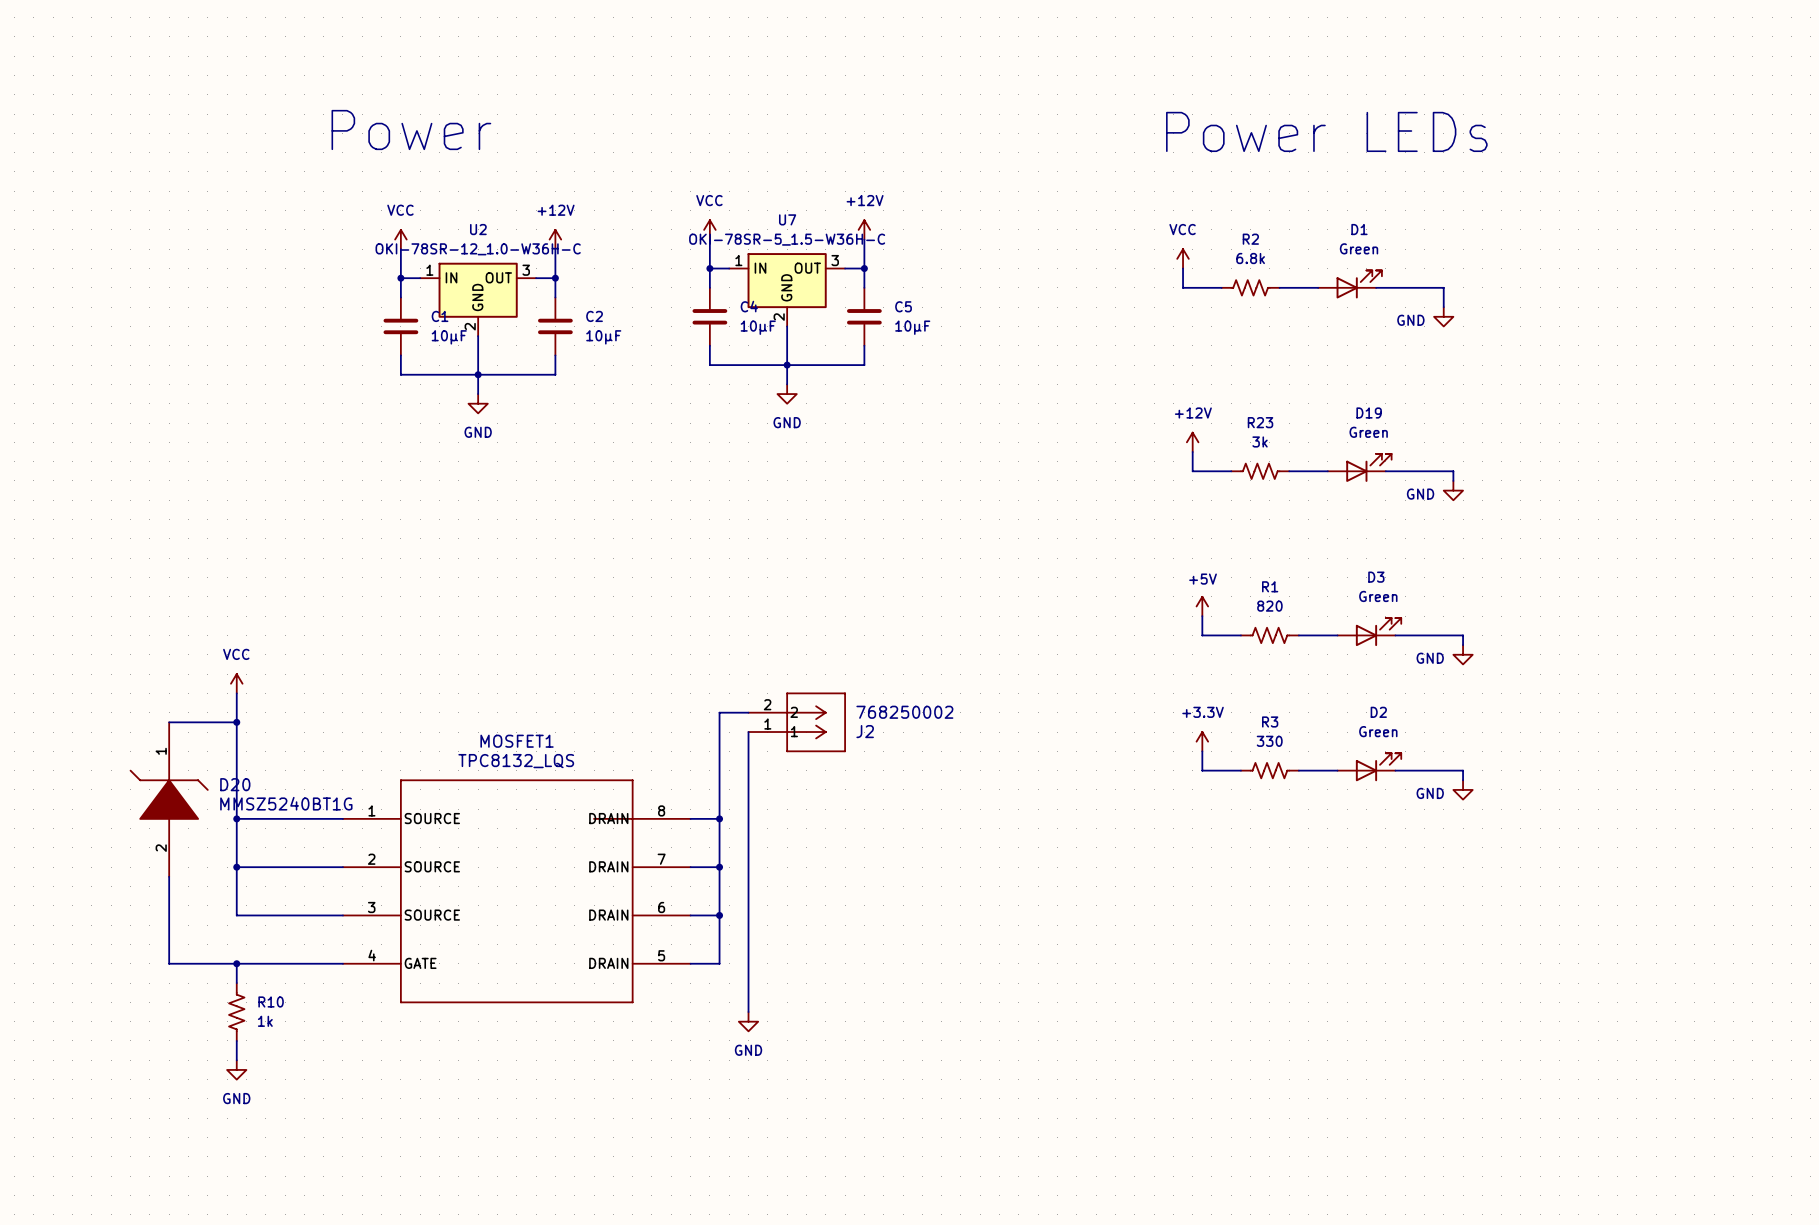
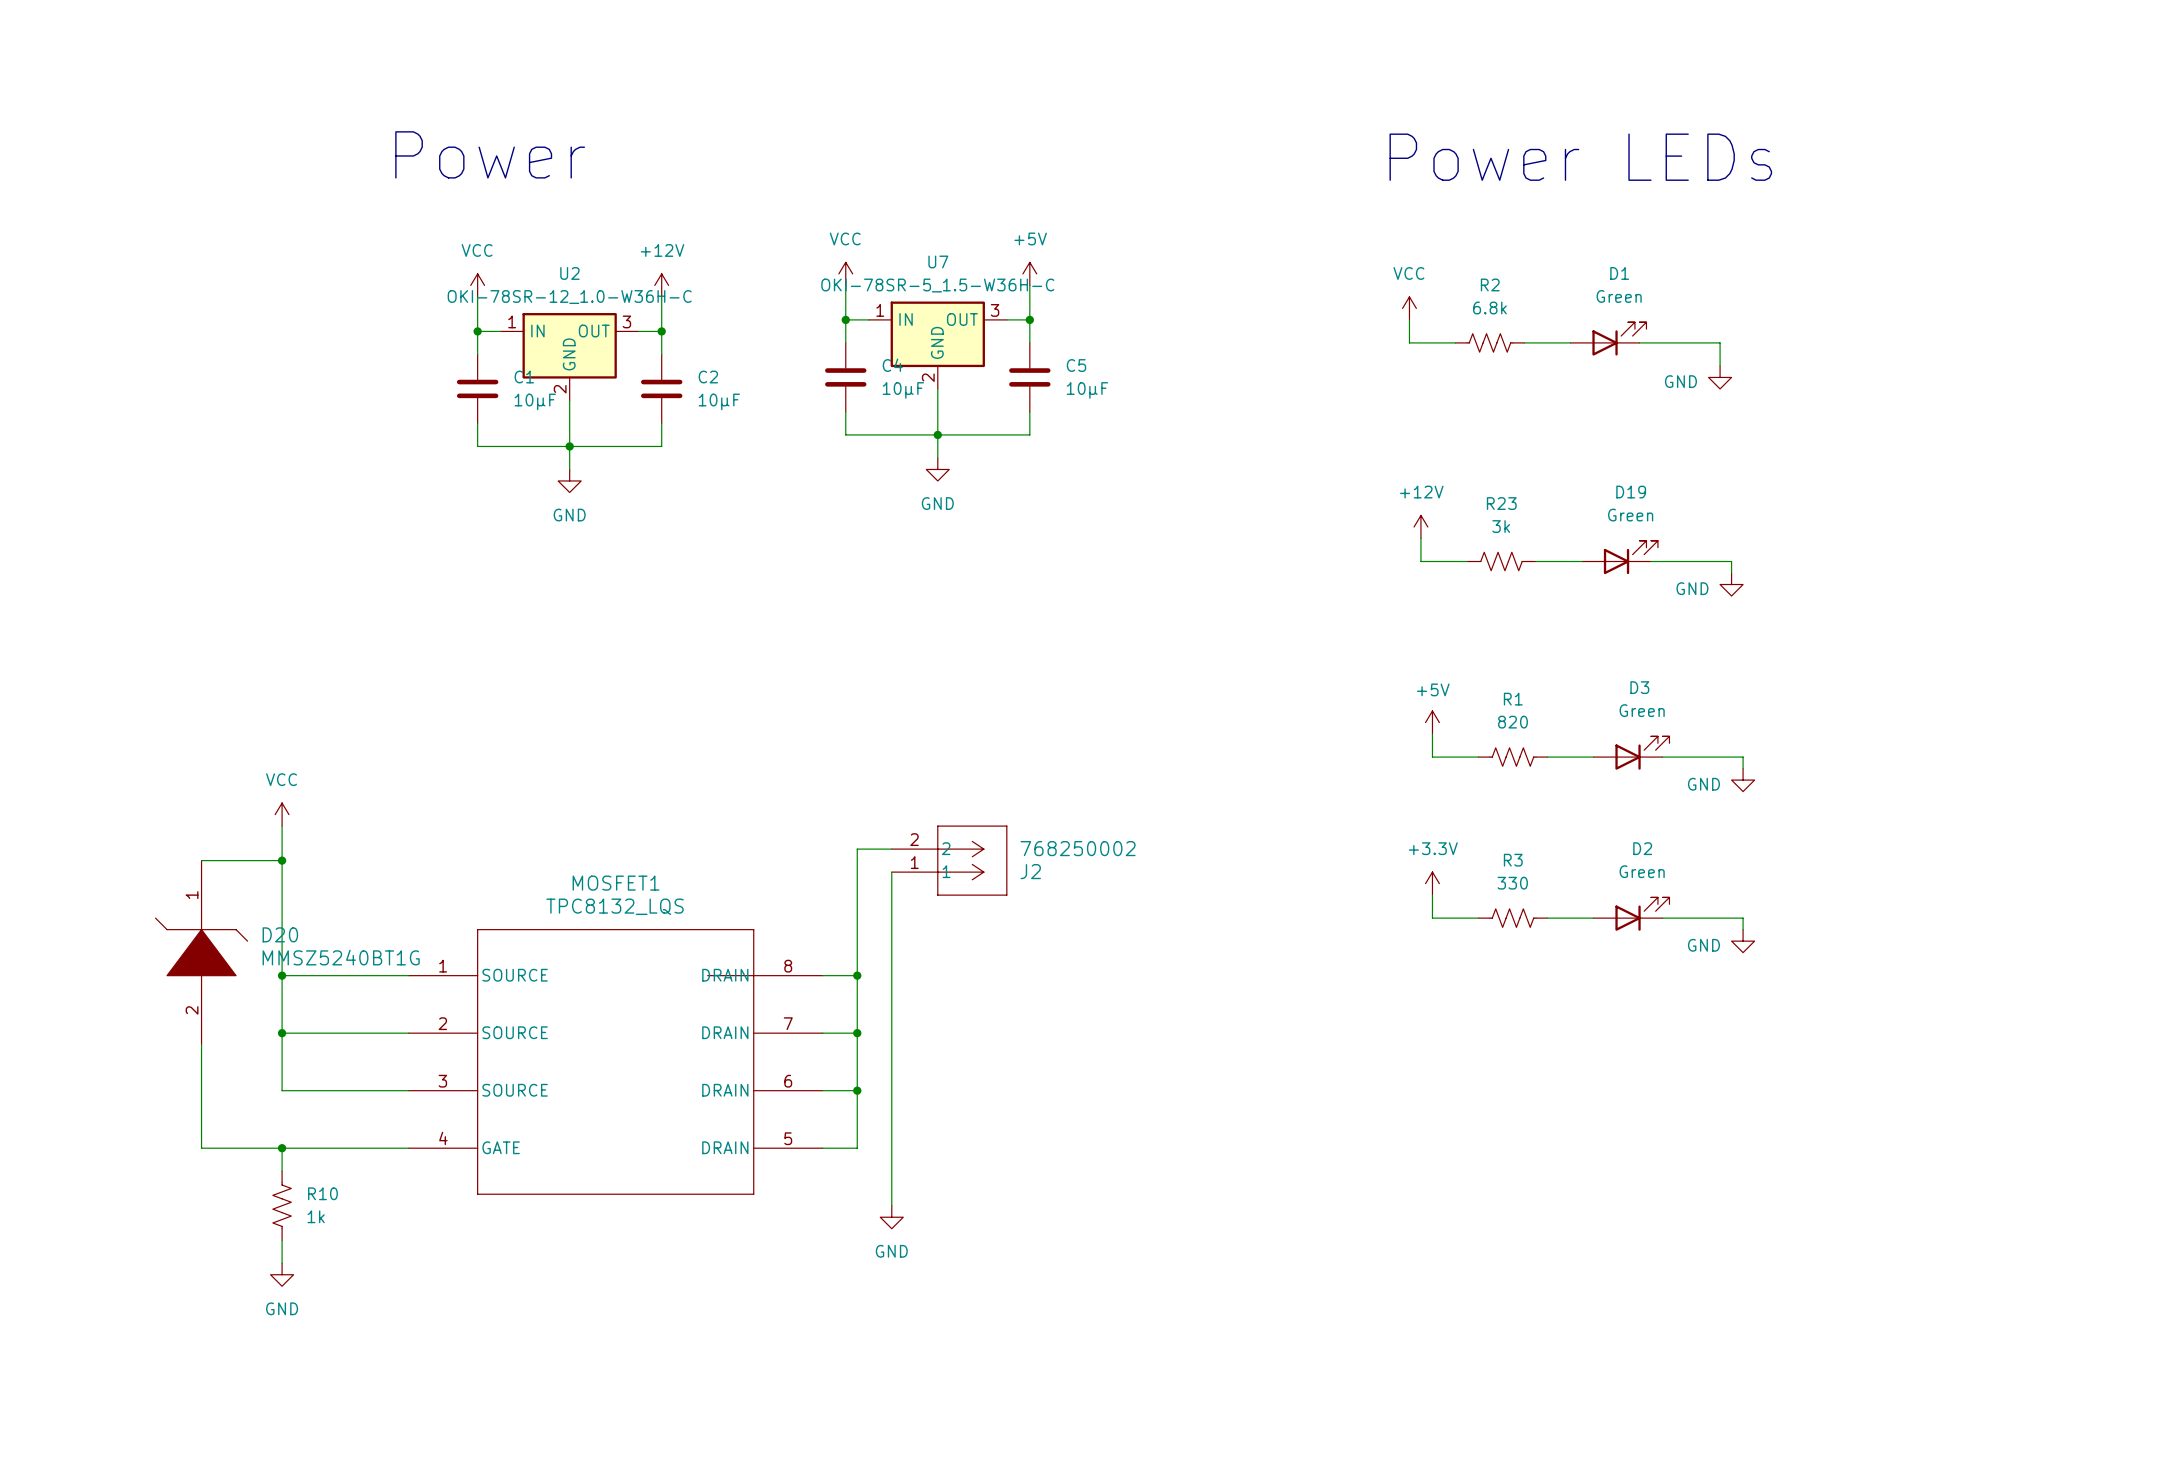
power symbol: +12V (864, 229) -> +5V (1029, 273)

